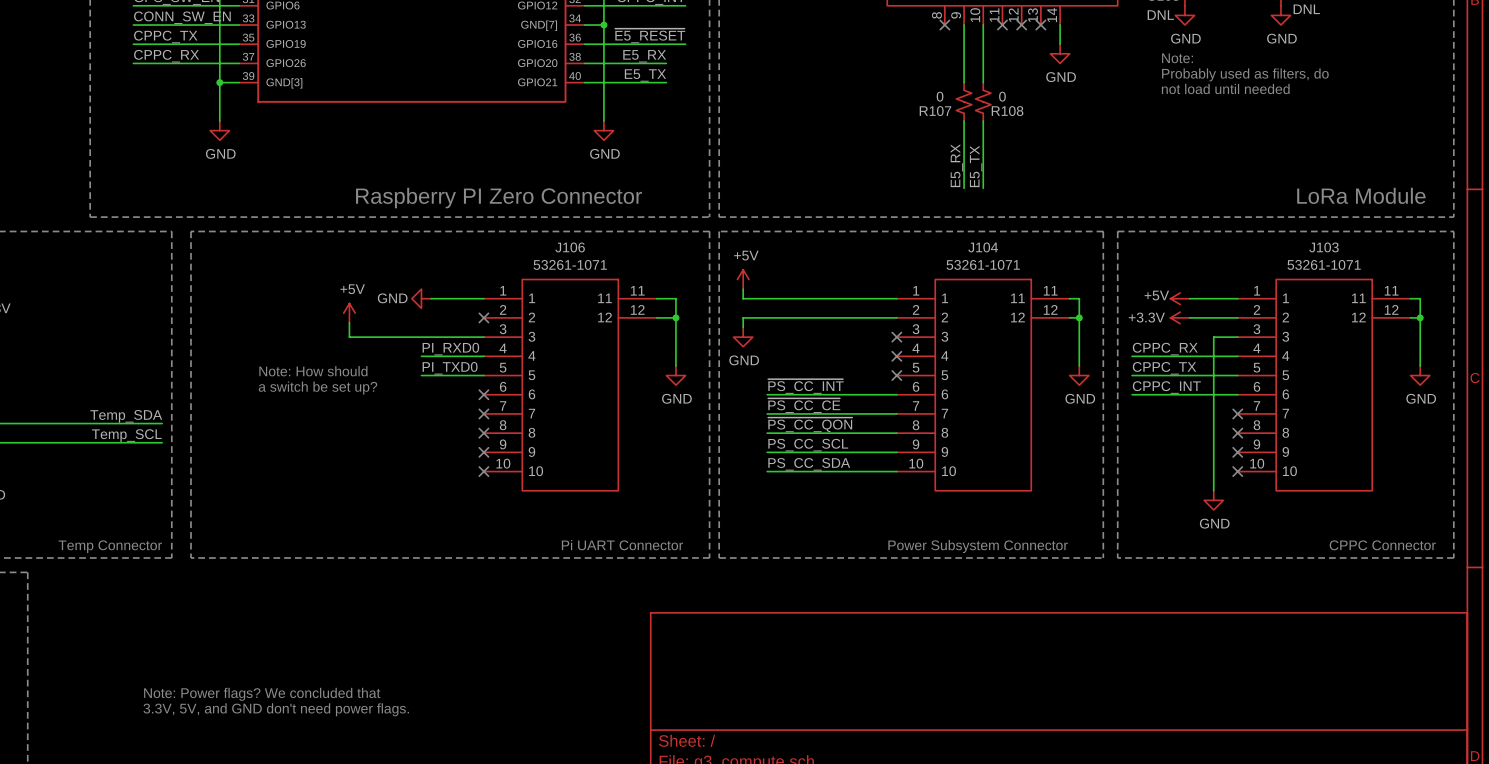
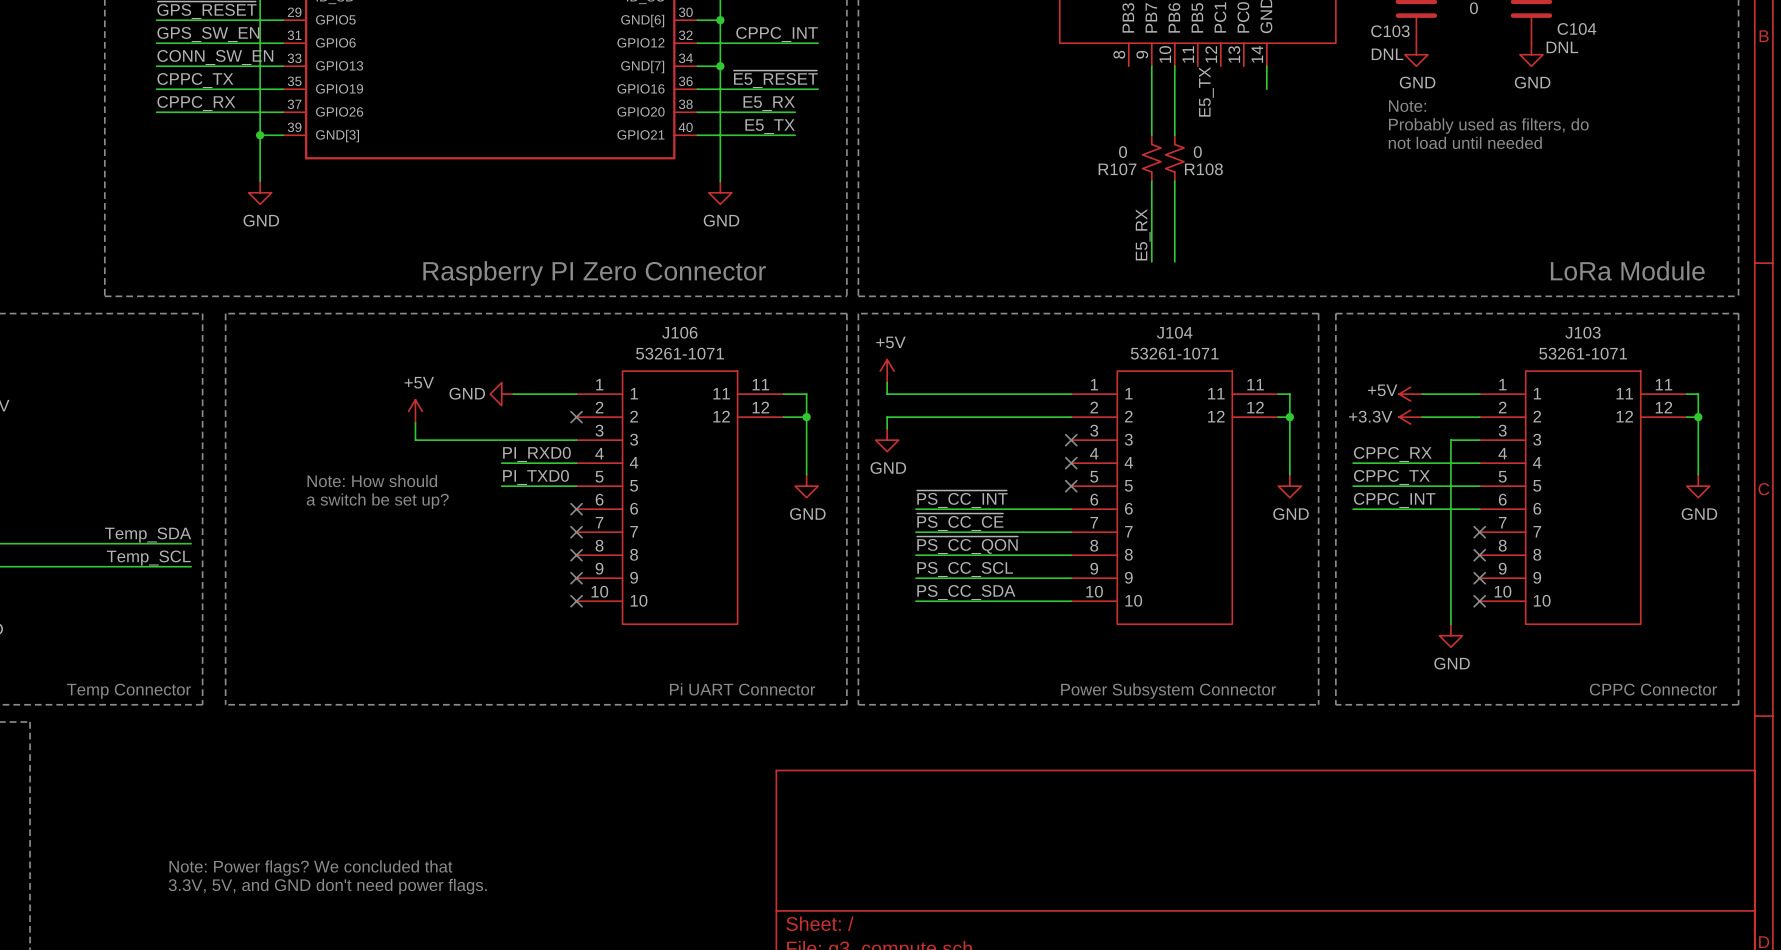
no-connect mark: (944, 25) -> none
no-connect mark: (1002, 25) -> none
no-connect mark: (1021, 25) -> none
no-connect mark: (1040, 25) -> none
power symbol: GND (1060, 53) -> none
label position: E5_TX (976, 166) -> E5_TX (1206, 91)

